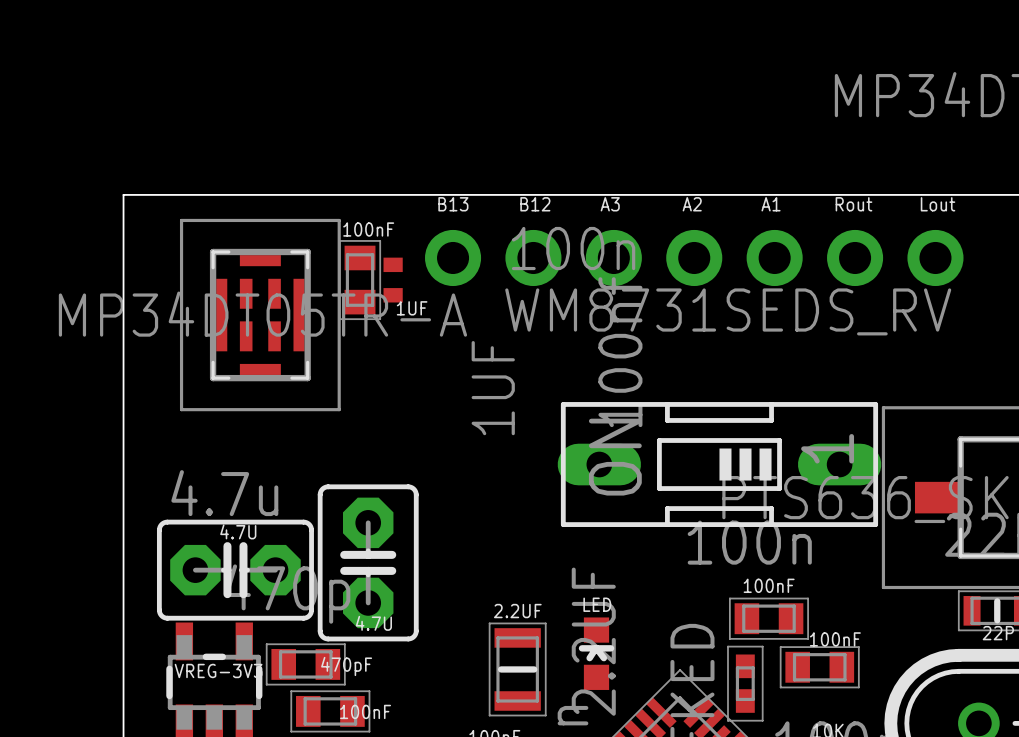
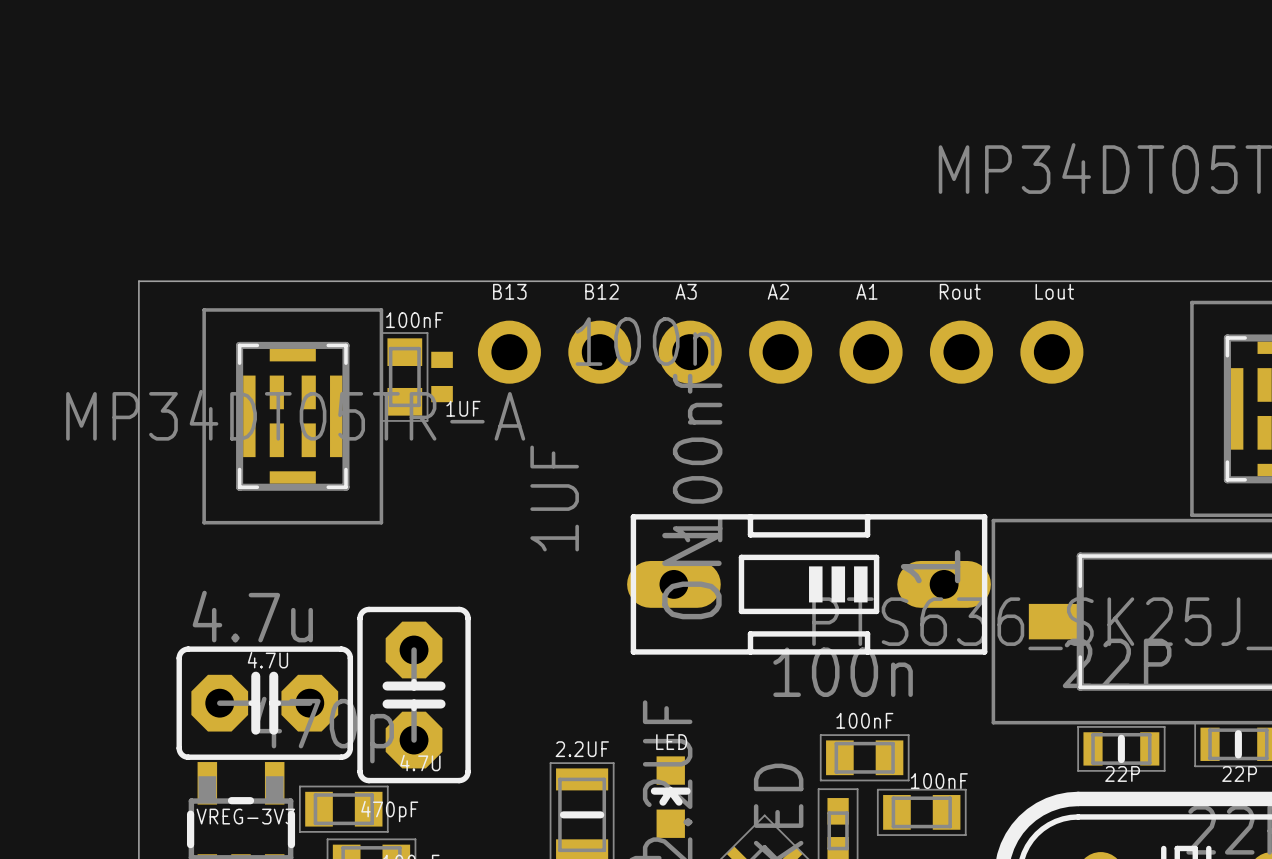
part value: WM8731SEDS_RV (728, 311) -> none

